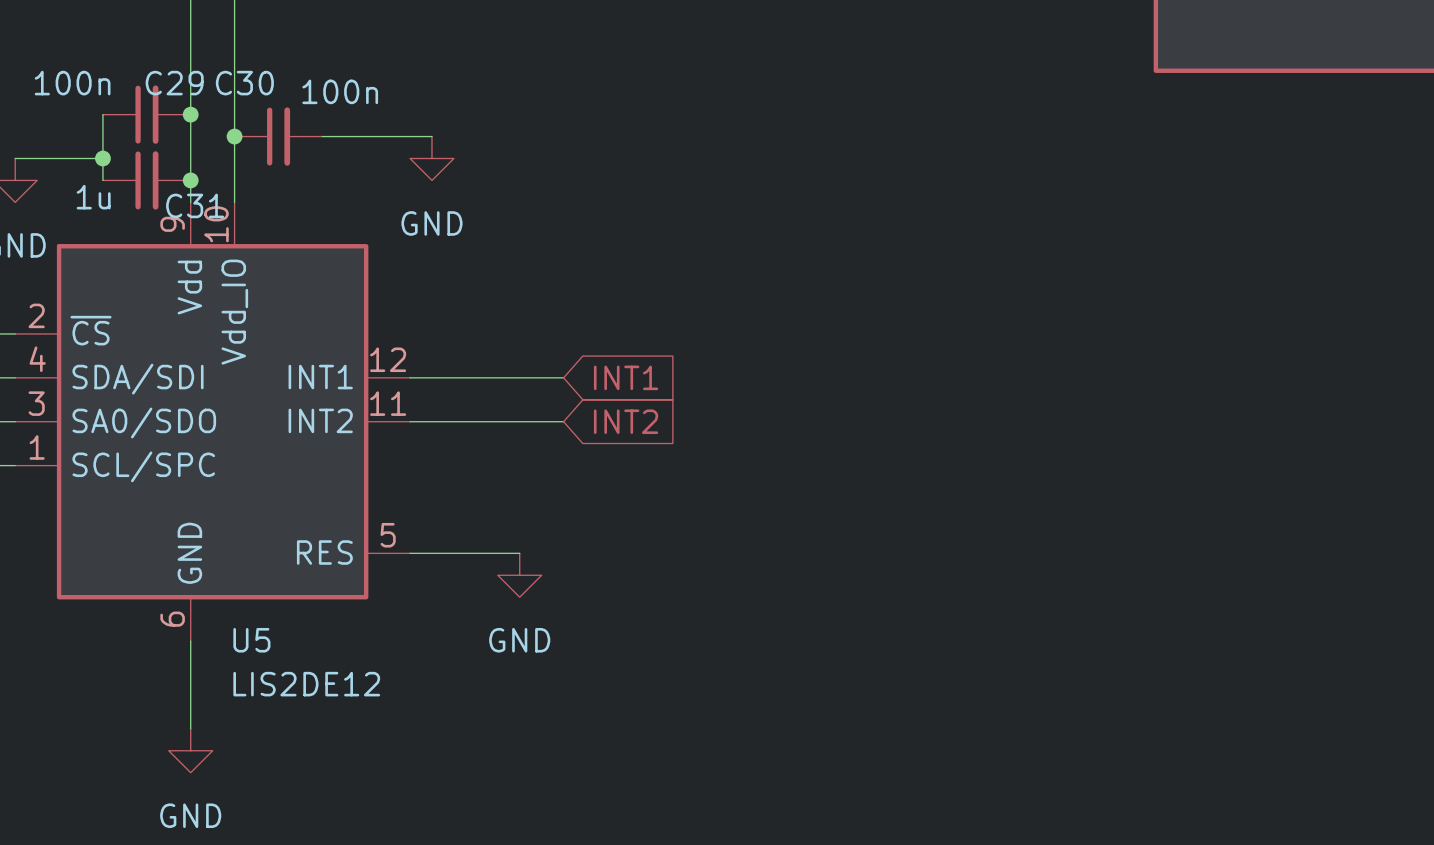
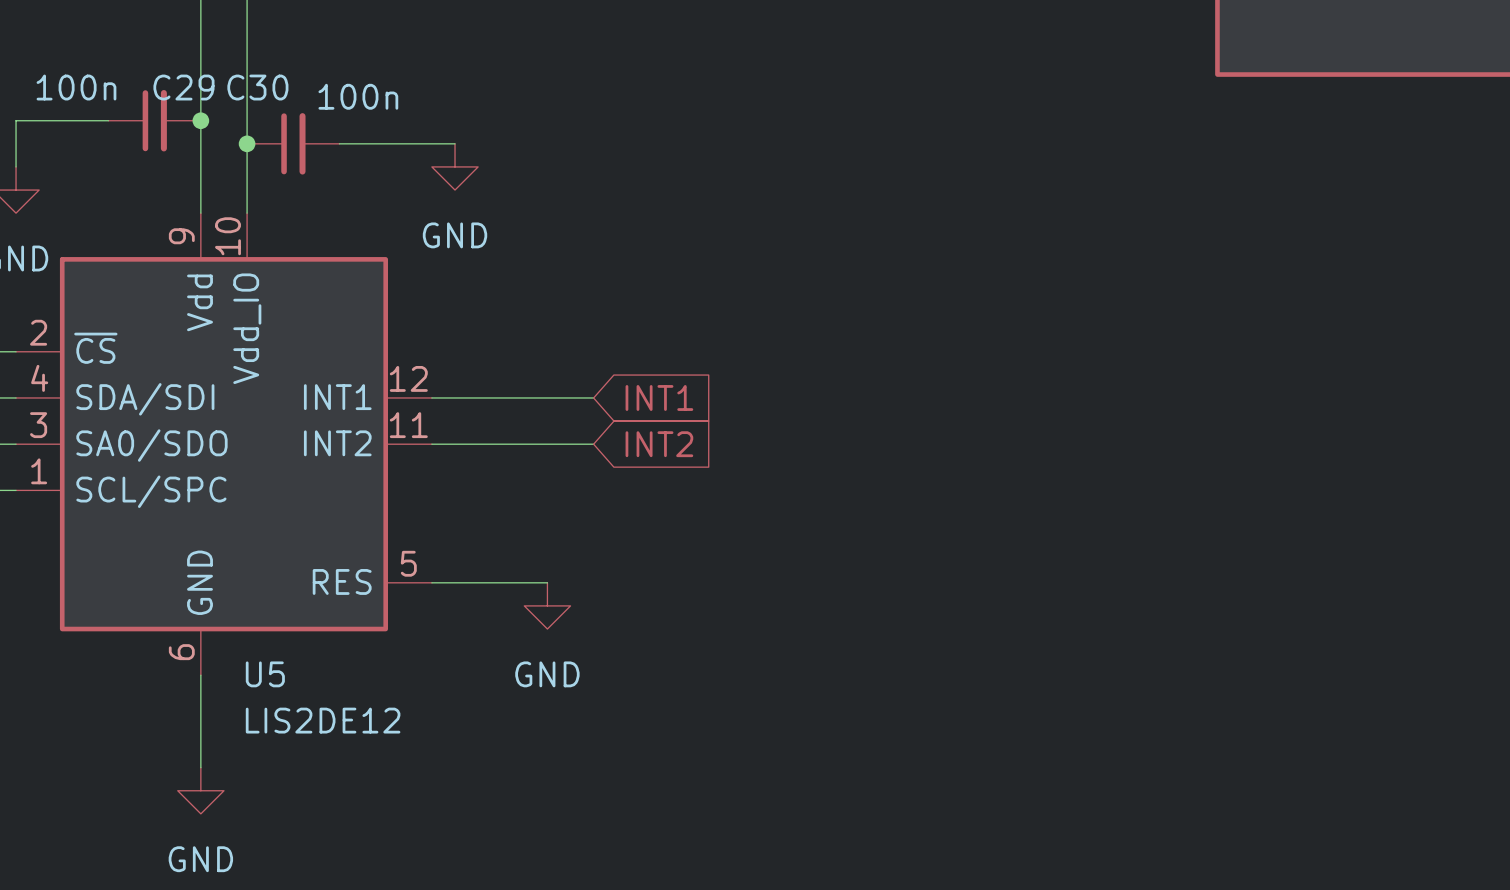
wire: (102, 114) (102, 180) -> none
wire: (15, 158) (102, 158) -> (16, 166) (16, 120) (108, 120)
junction: (102, 158) -> none
C31: 1u (146, 180) -> none
junction: (190, 180) -> none

